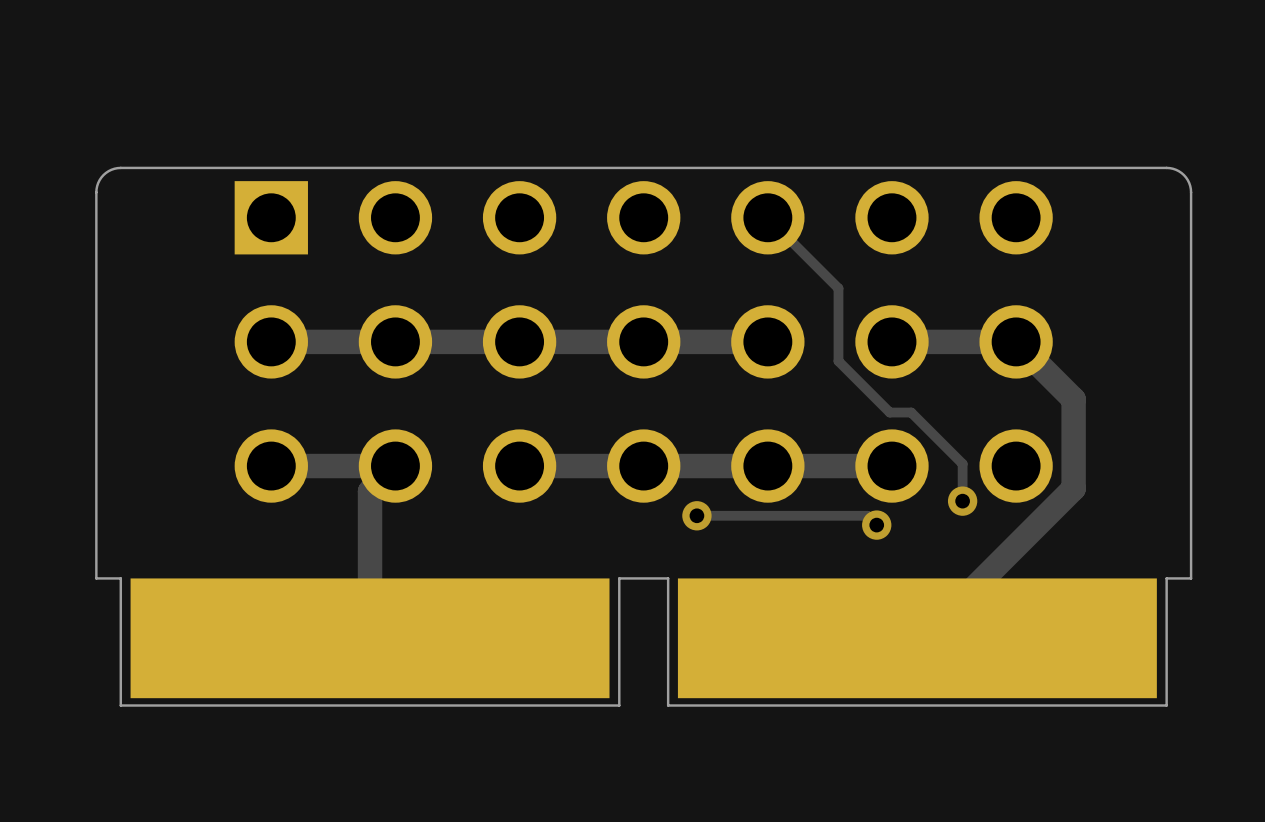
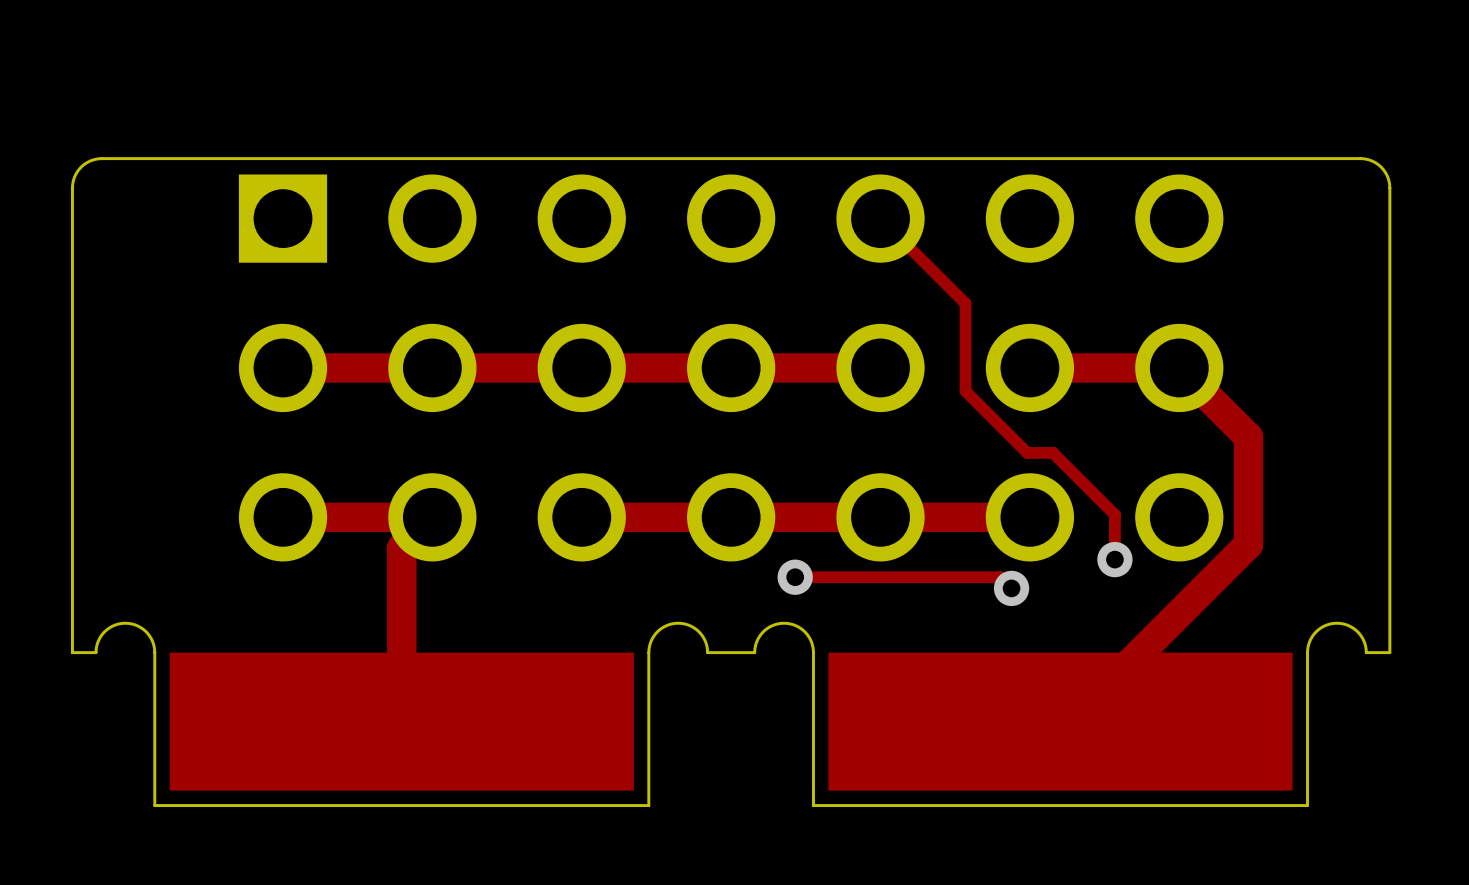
board edge: (115, 578) (120, 578) (120, 705) (164, 705) -> (95, 652) (98, 641) (104, 631) (121, 623) (140, 627) (152, 641) (154, 652) (154, 805)
part footprint: [130, 578, 610, 699] -> [169, 652, 634, 791]
board edge: (624, 578) (619, 578) (619, 705) (575, 705) -> (707, 652) (702, 635) (694, 628) (685, 624) (674, 623) (664, 626) (656, 633) (650, 642) (648, 652) (648, 805)
board edge: (663, 578) (668, 578) (668, 705) (712, 705) -> (754, 652) (756, 641) (763, 631) (780, 623) (798, 627) (811, 641) (813, 652) (813, 805)
part footprint: [677, 578, 1157, 699] -> [828, 652, 1293, 791]
board edge: (1171, 578) (1166, 578) (1166, 705) (1122, 705) -> (1366, 652) (1364, 642) (1358, 633) (1350, 626) (1340, 623) (1323, 626) (1314, 633) (1309, 642) (1307, 652) (1307, 805)

